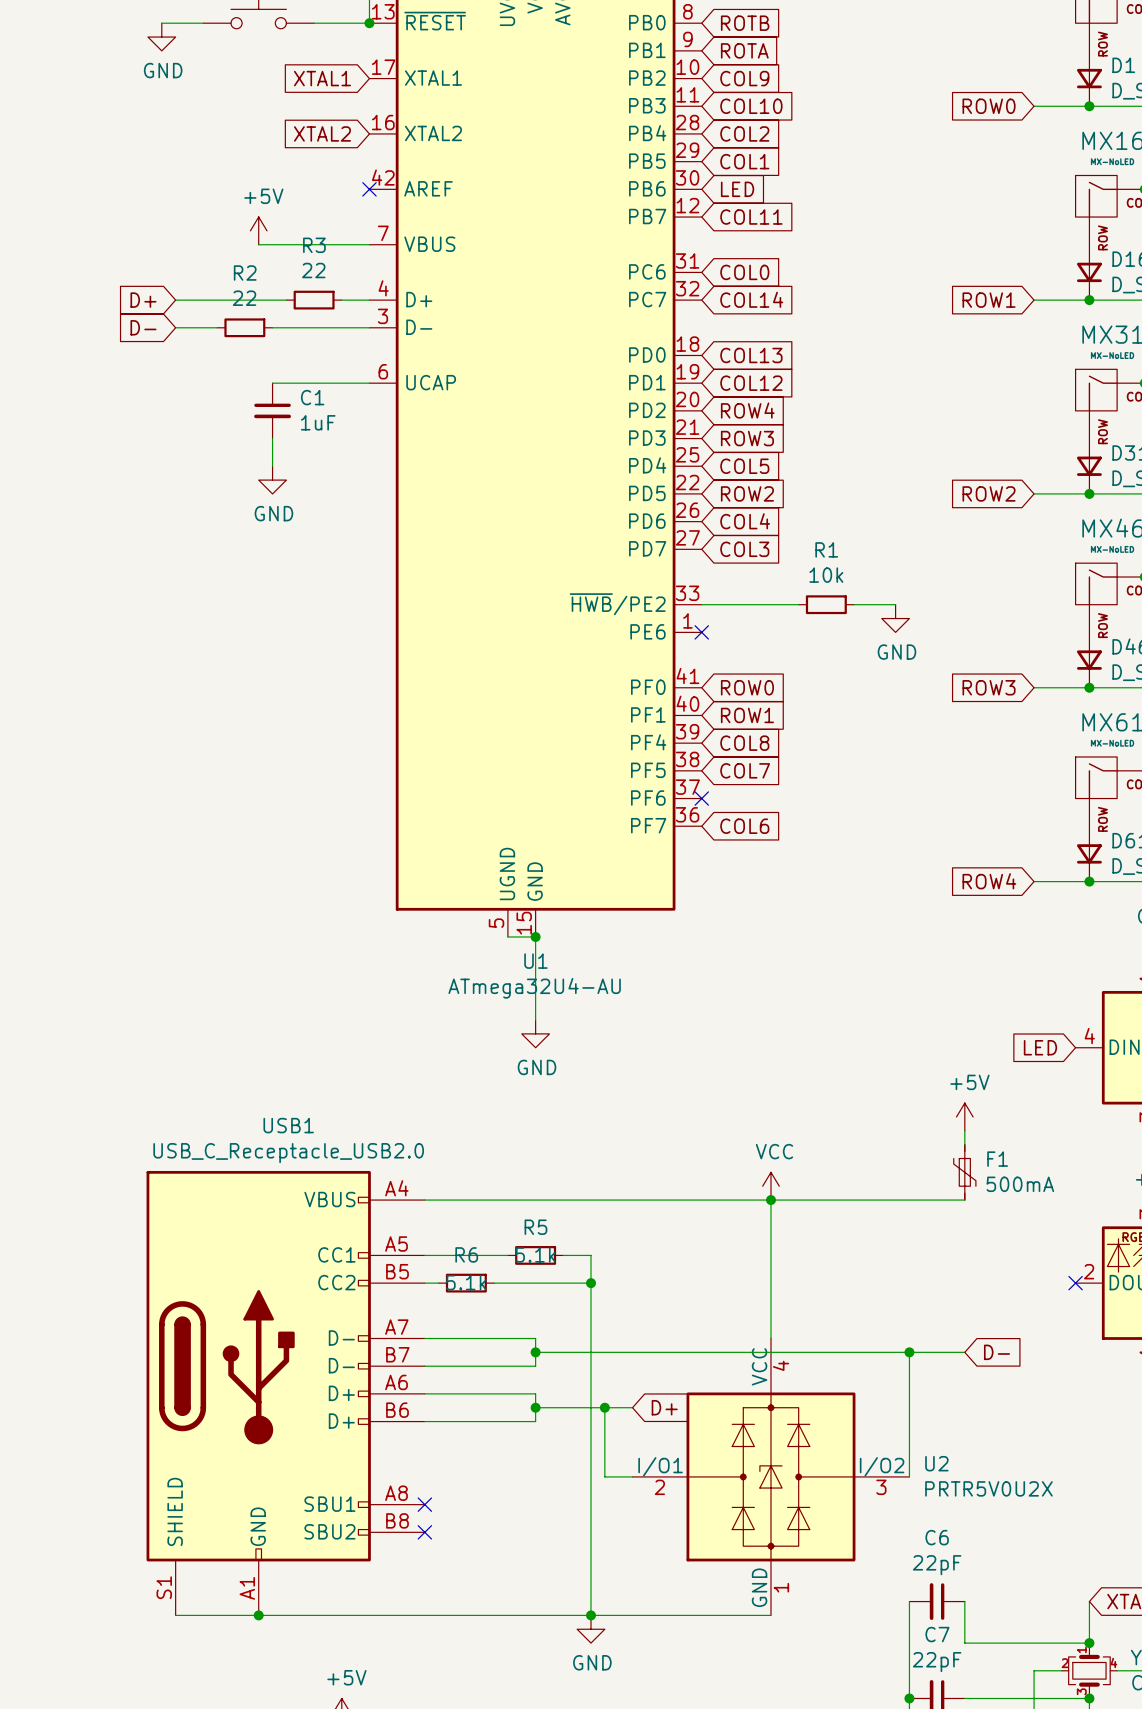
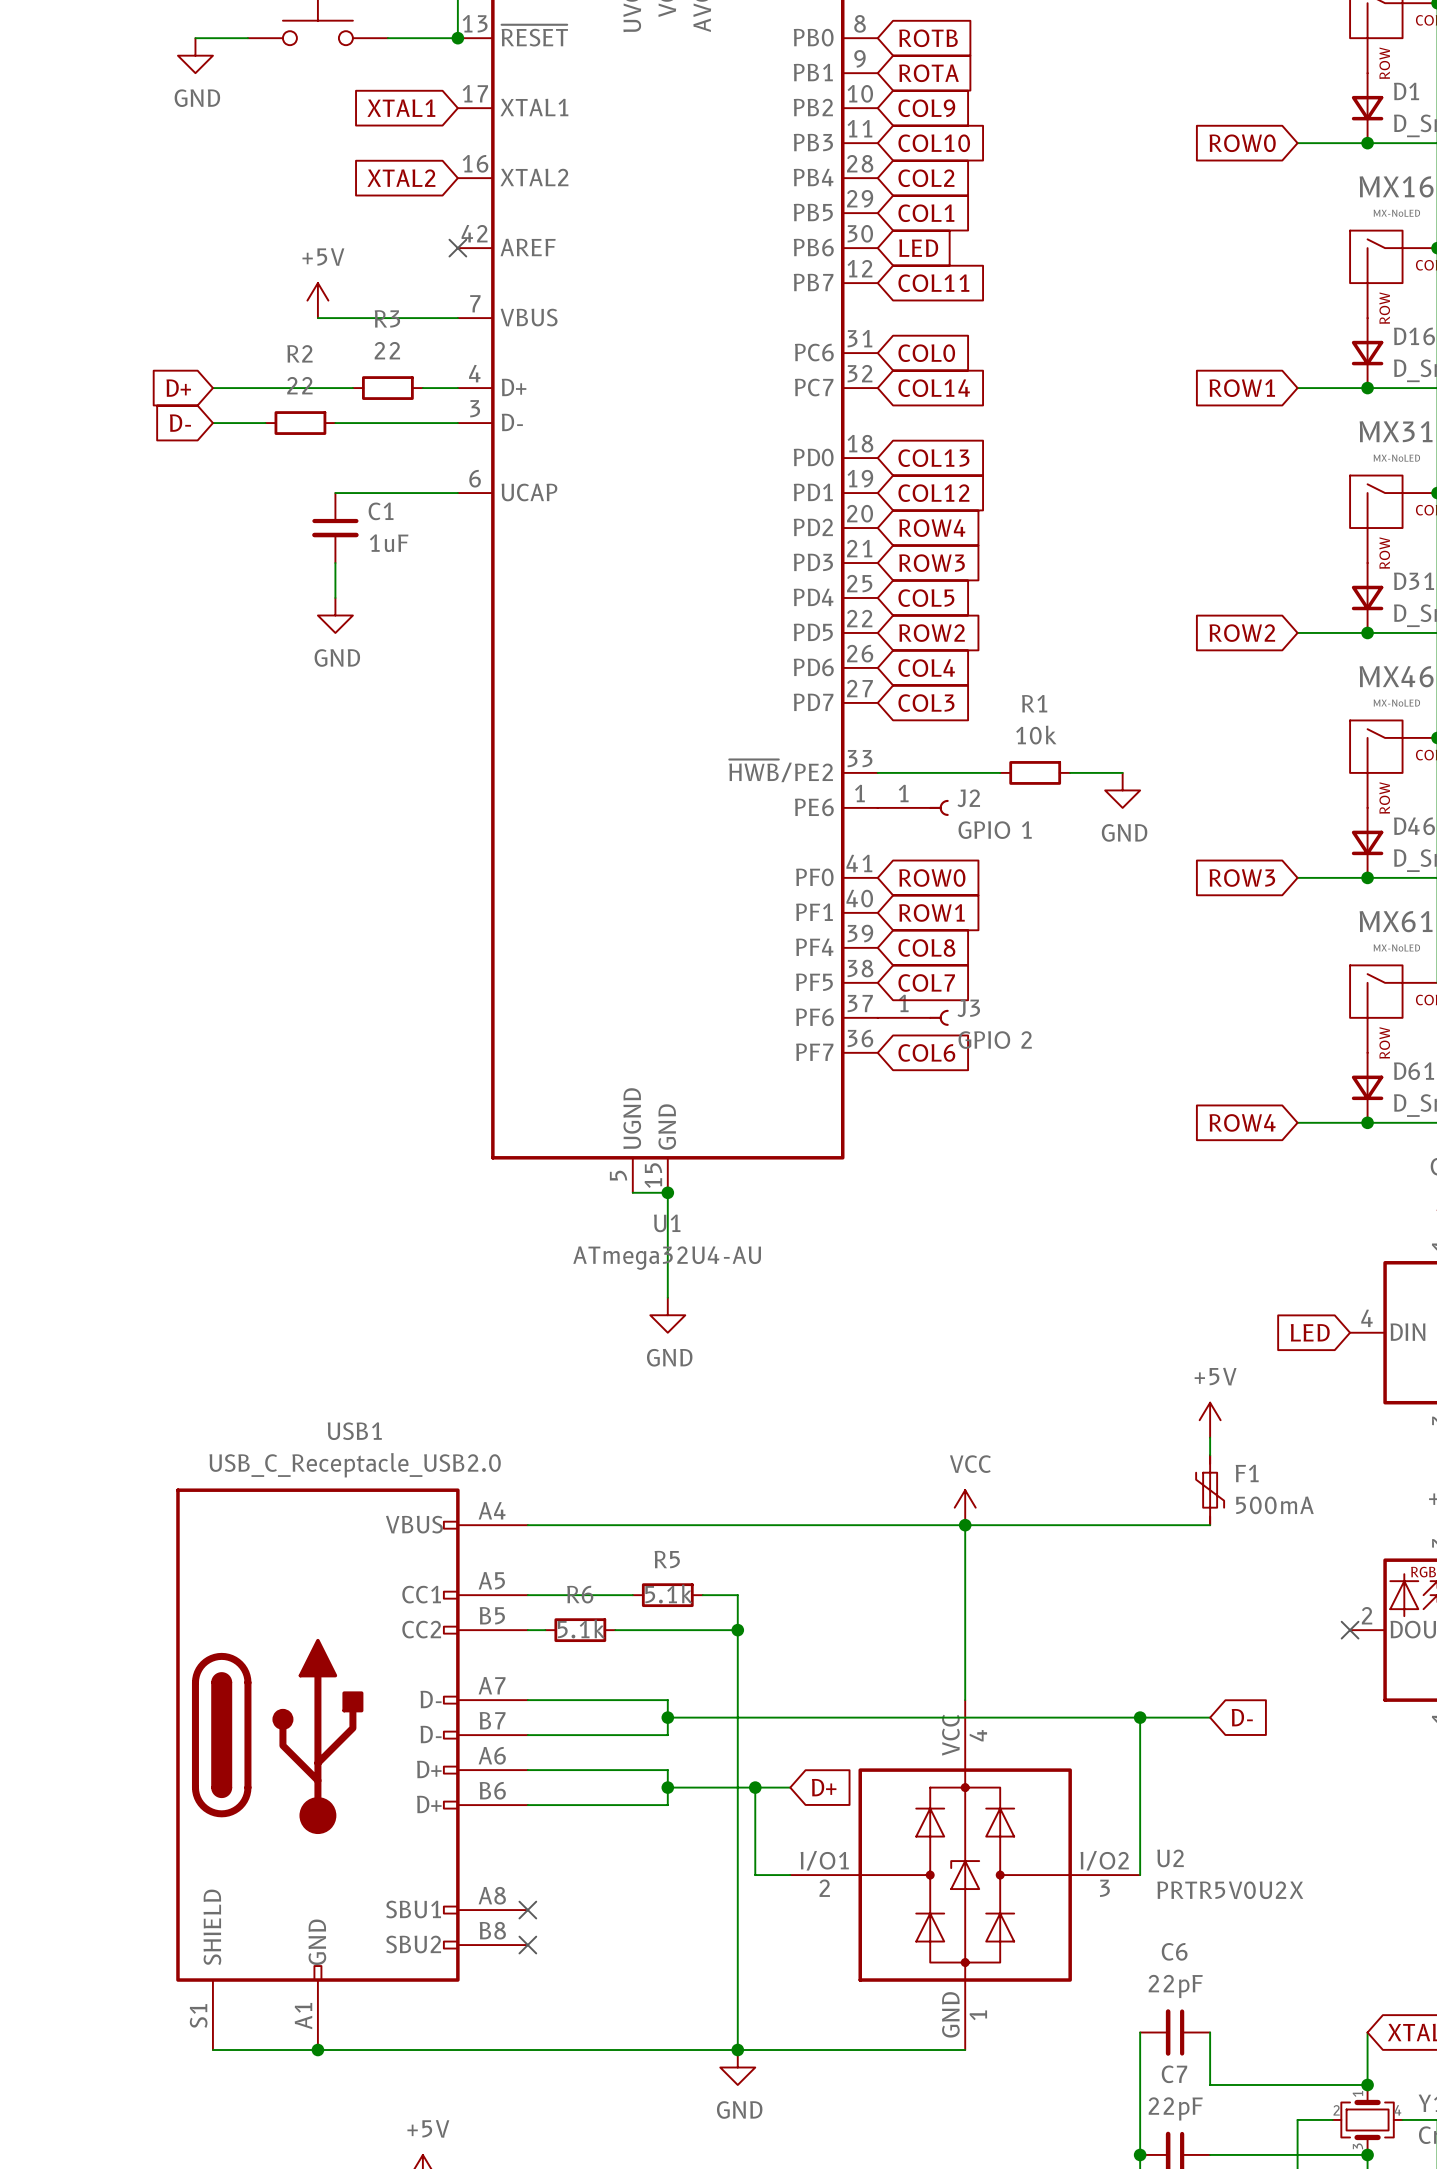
no-connect mark: (701, 632) -> none
J2: none -> GPIO 1 (913, 807)
no-connect mark: (701, 798) -> none
J3: none -> GPIO 2 (913, 1017)

